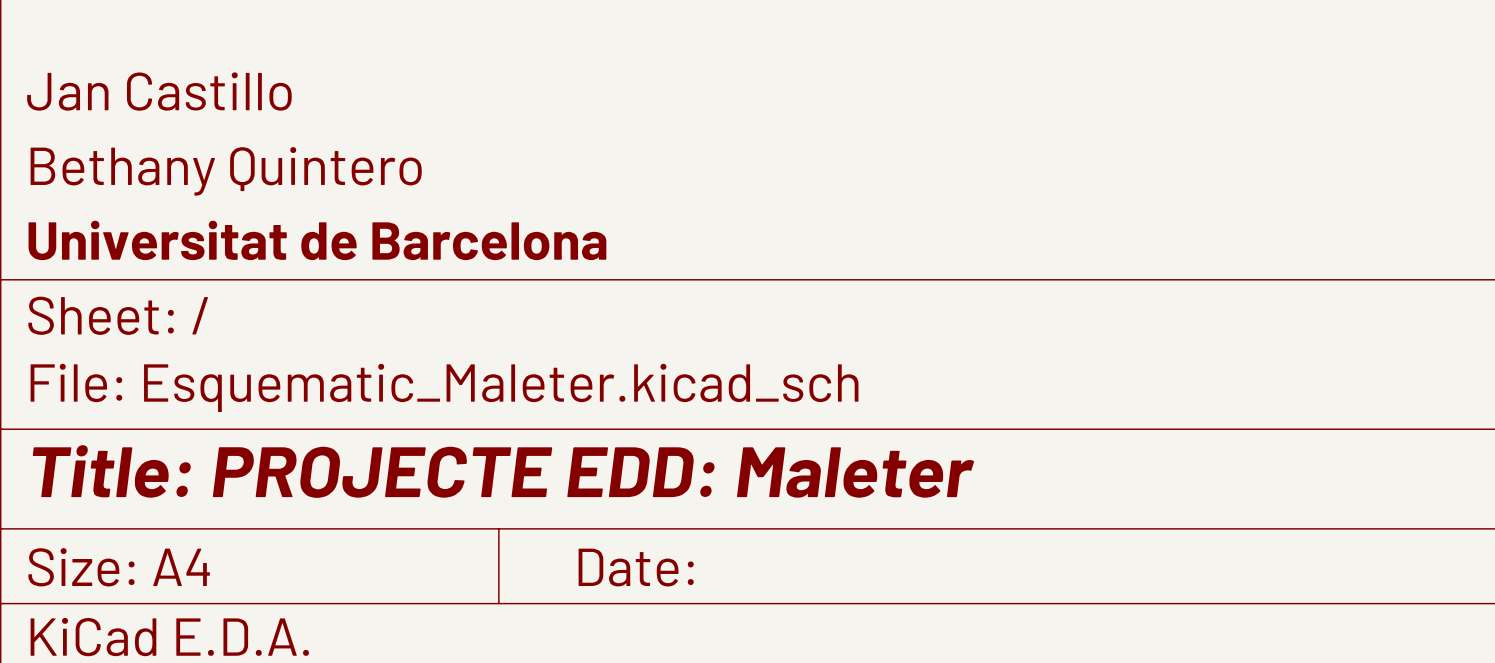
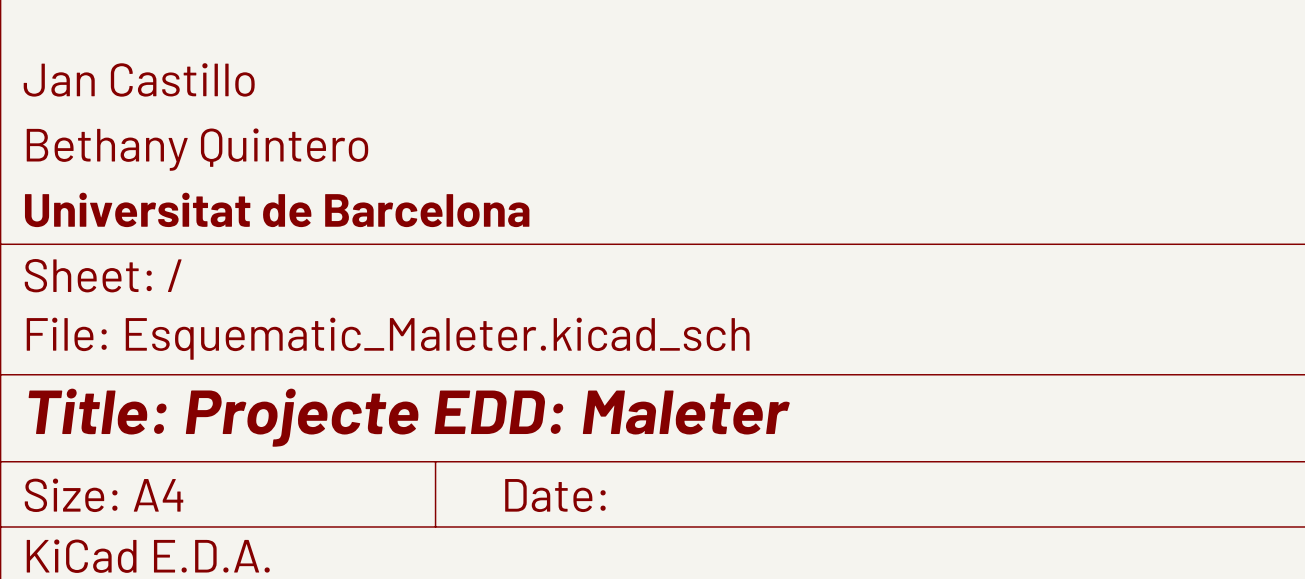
title block: Title: PROJECTE EDD: Maleter (503, 471) -> Title: Projecte EDD: Maleter (409, 417)

